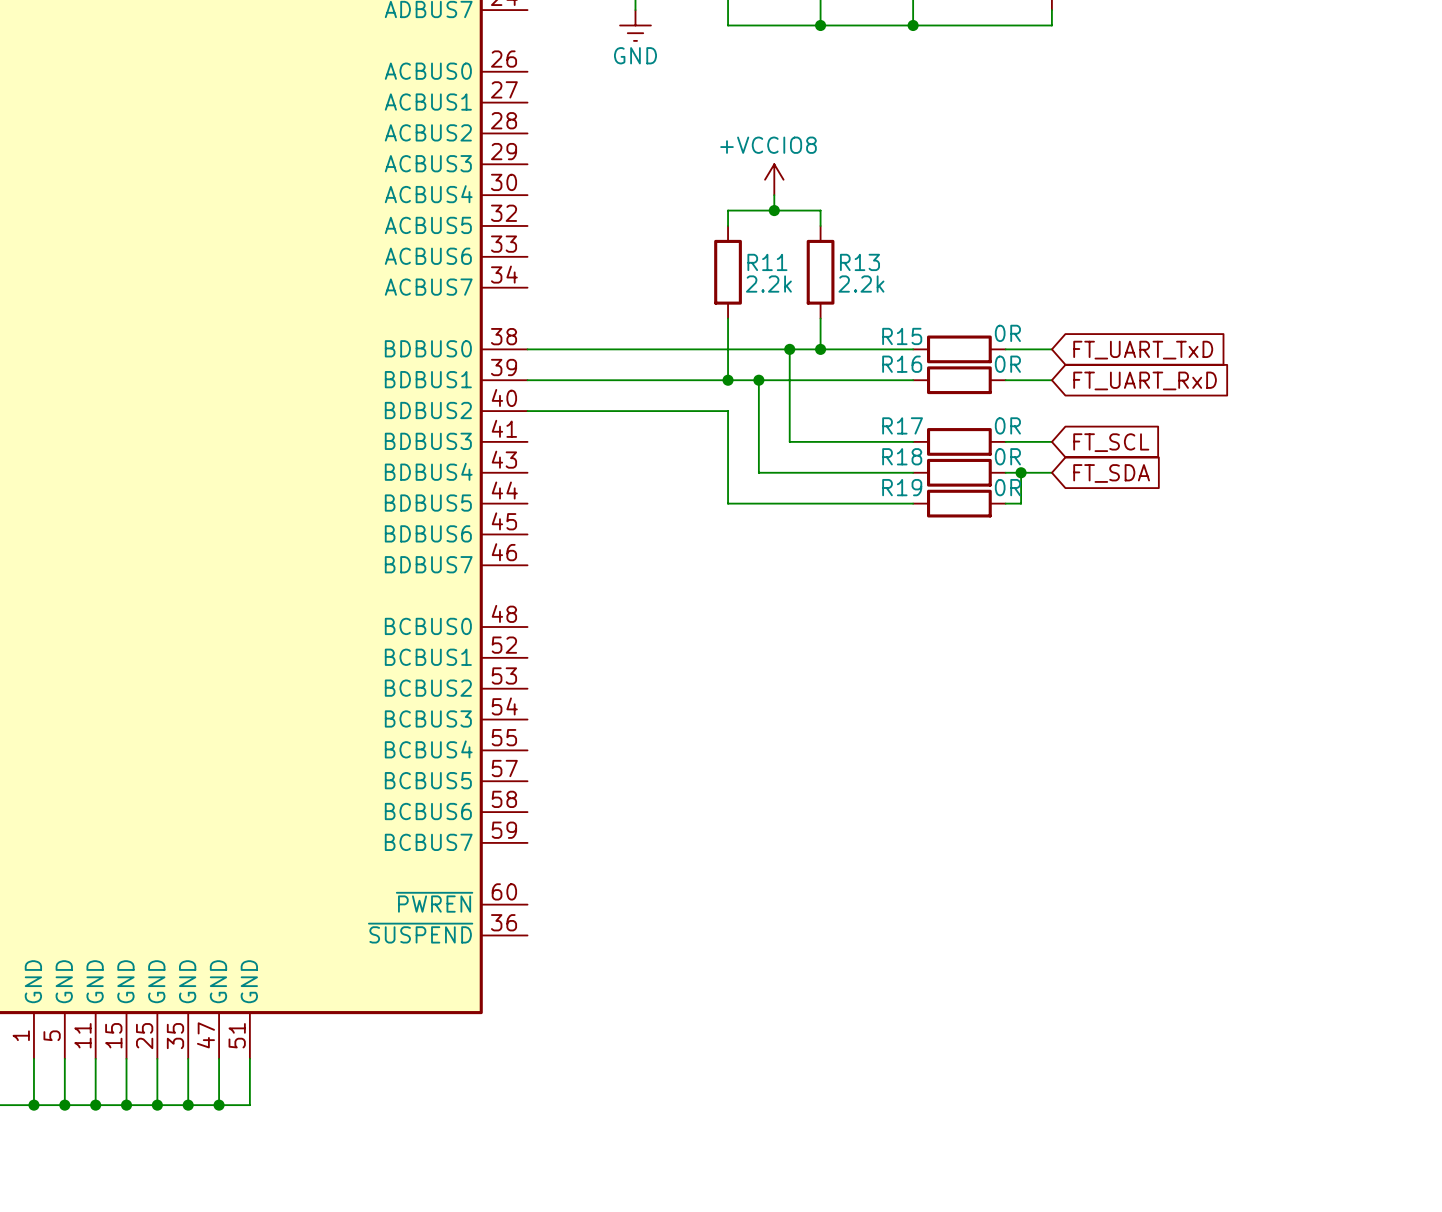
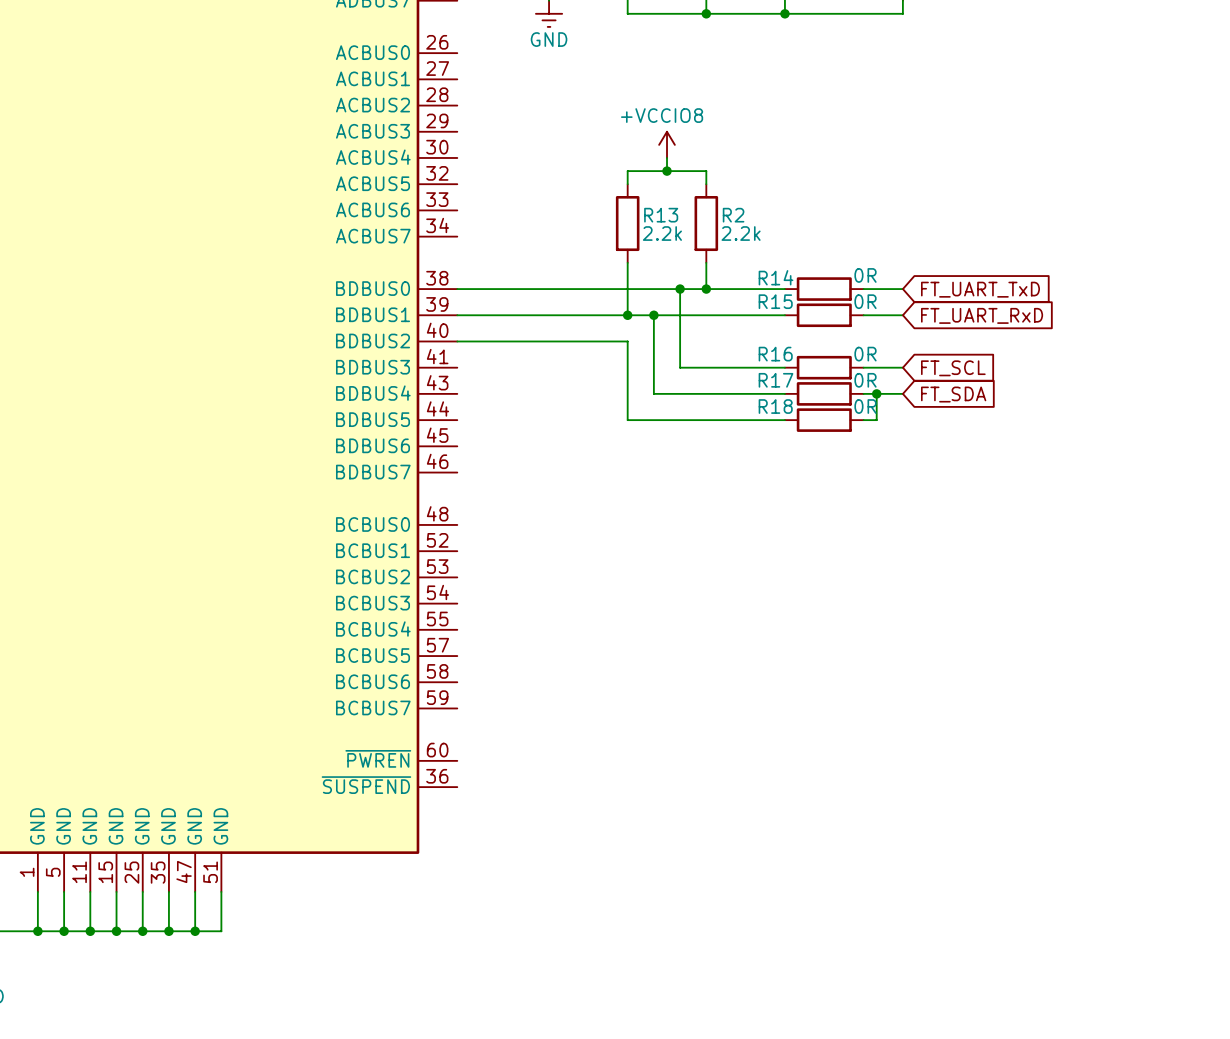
R11 name: R11 (767, 262) -> R13 (661, 215)
R13 name: R13 (859, 262) -> R2 (733, 215)
R15 name: R15 (902, 336) -> R14 (776, 277)
R16 name: R16 (902, 364) -> R15 (775, 301)
R17 name: R17 (902, 425) -> R16 (775, 354)
R18 name: R18 (902, 456) -> R17 (776, 380)
R19 name: R19 (902, 487) -> R18 (775, 406)

